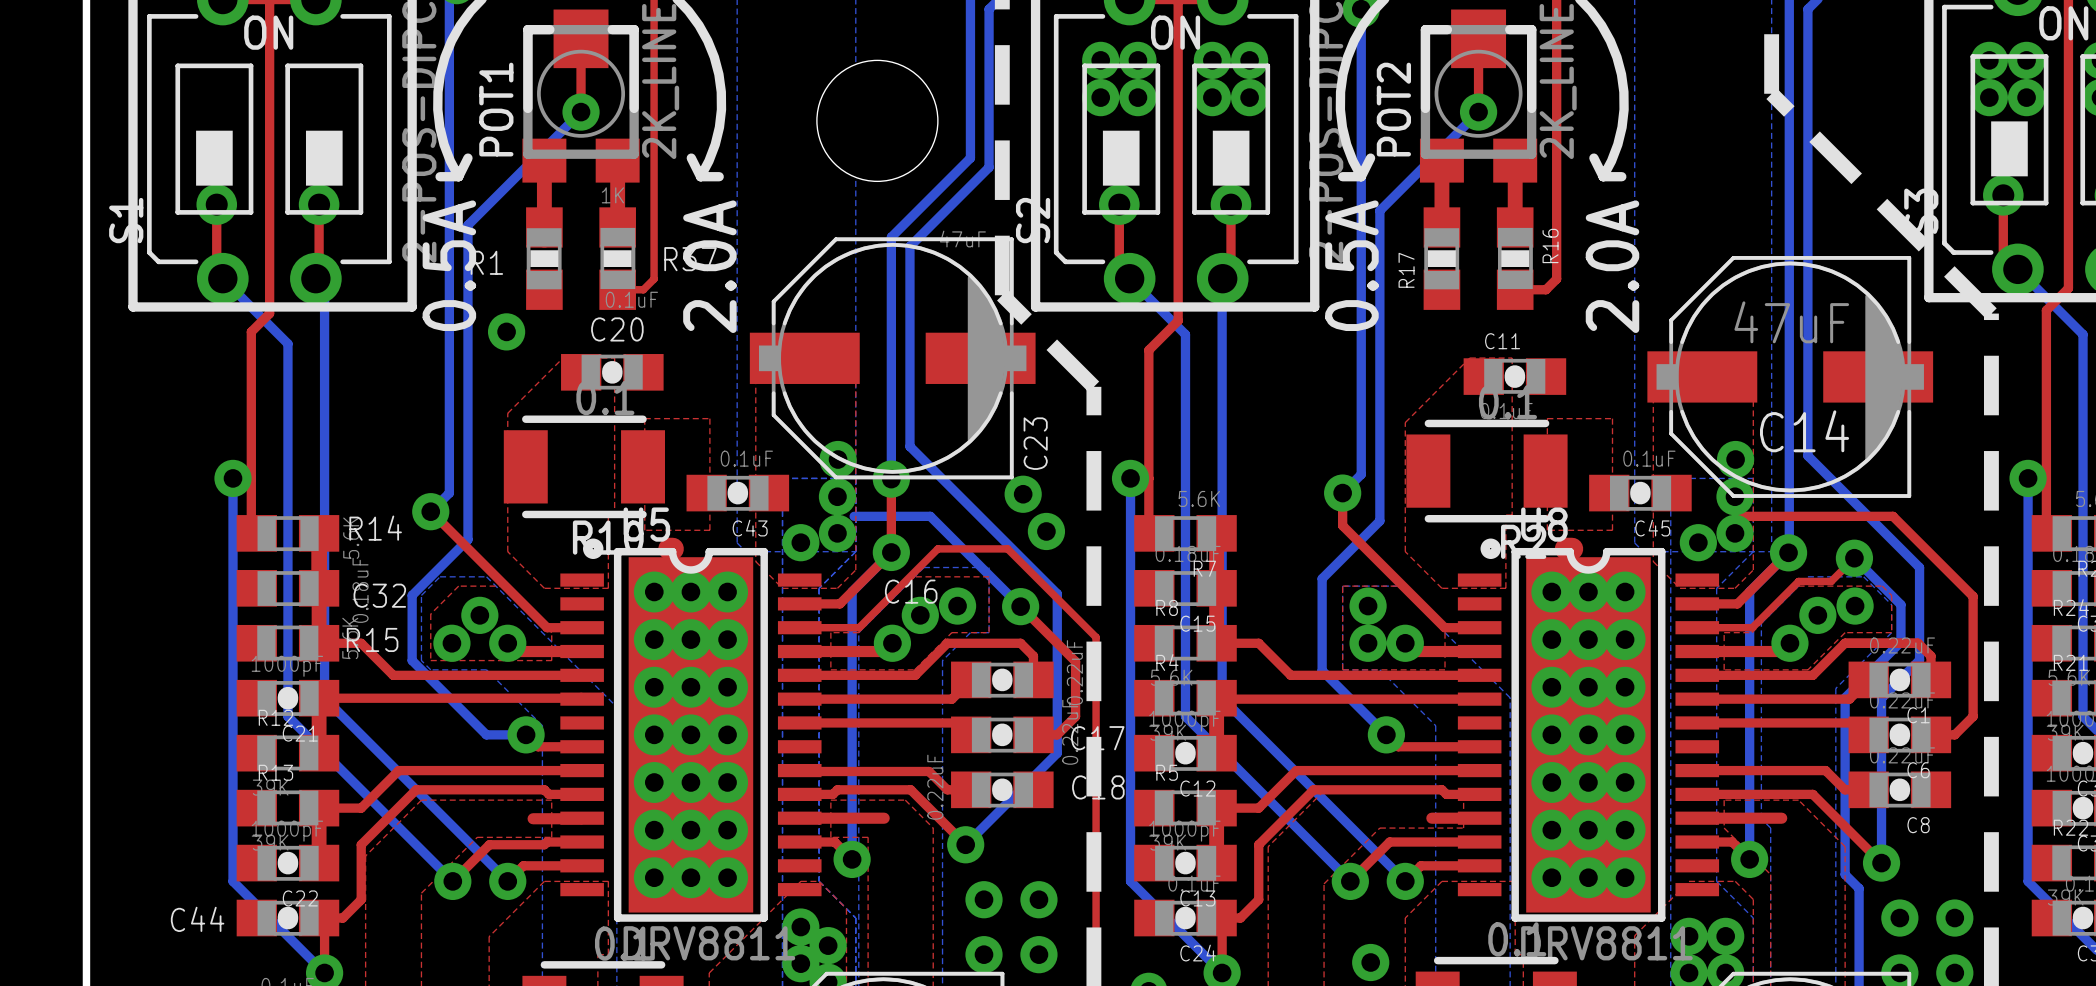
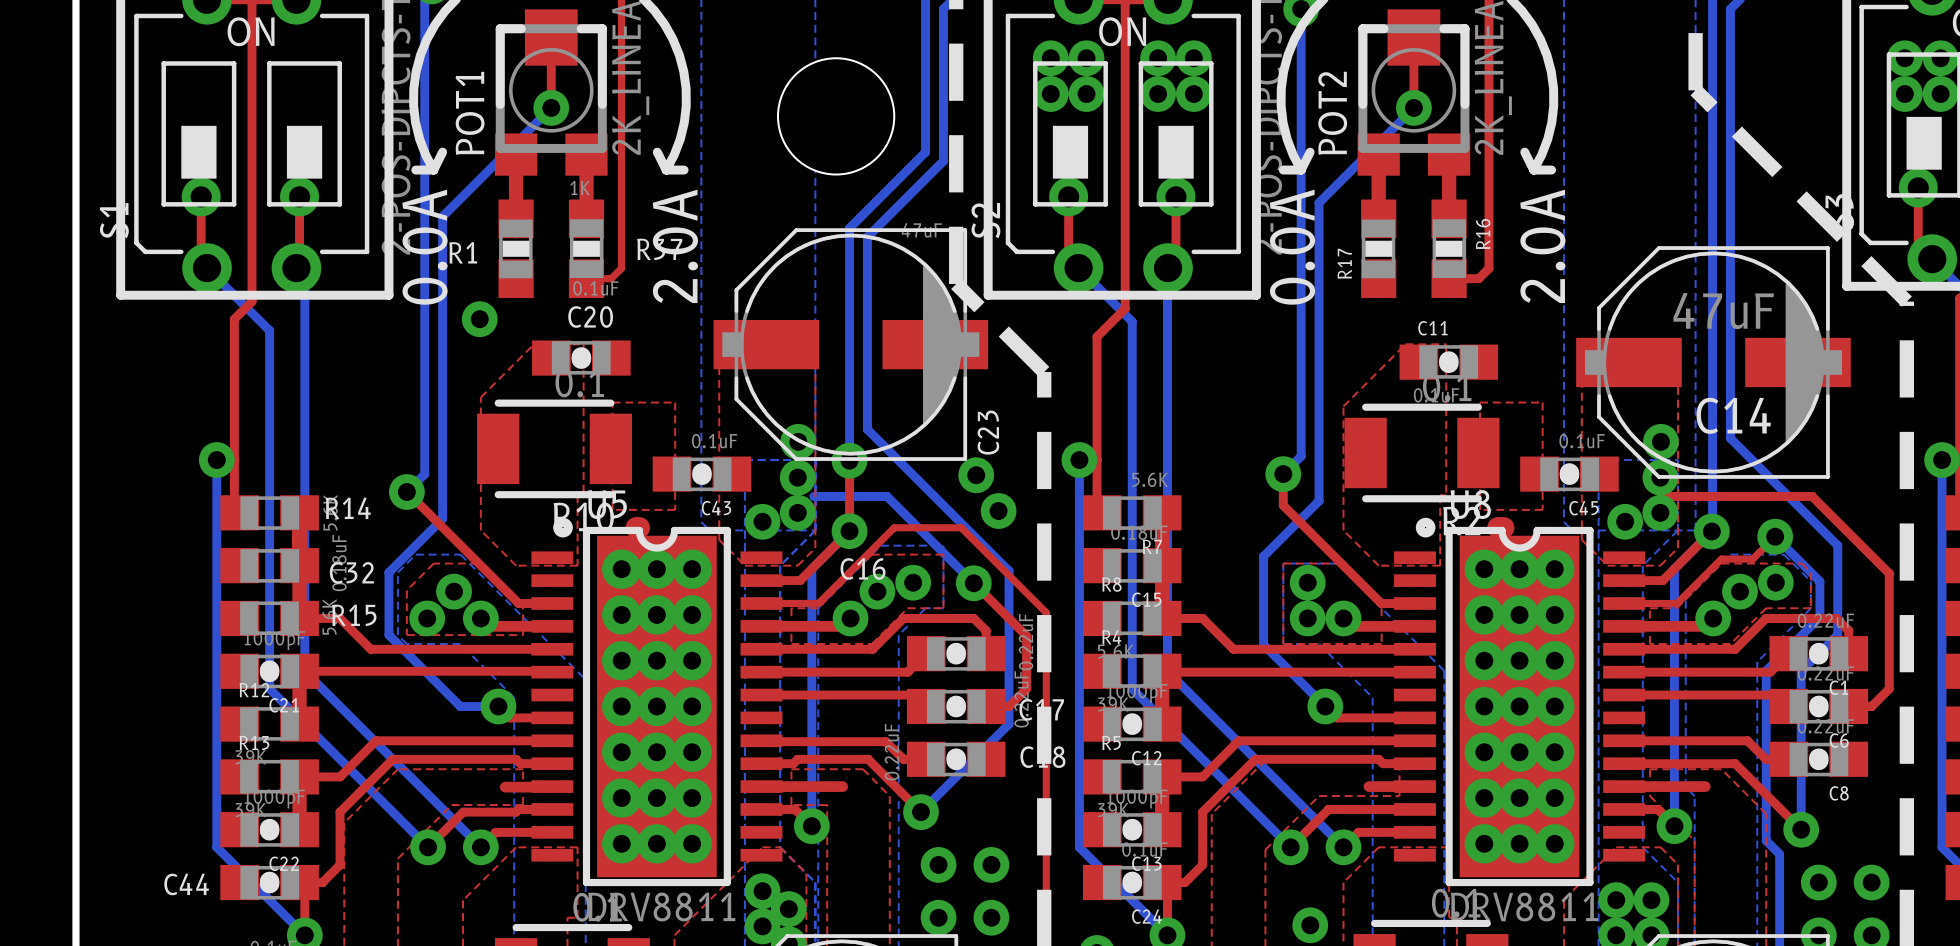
text: 0.5A (449, 265) -> 0.0A (425, 247)
text: 0.5A (1351, 265) -> 0.0A (1292, 247)

